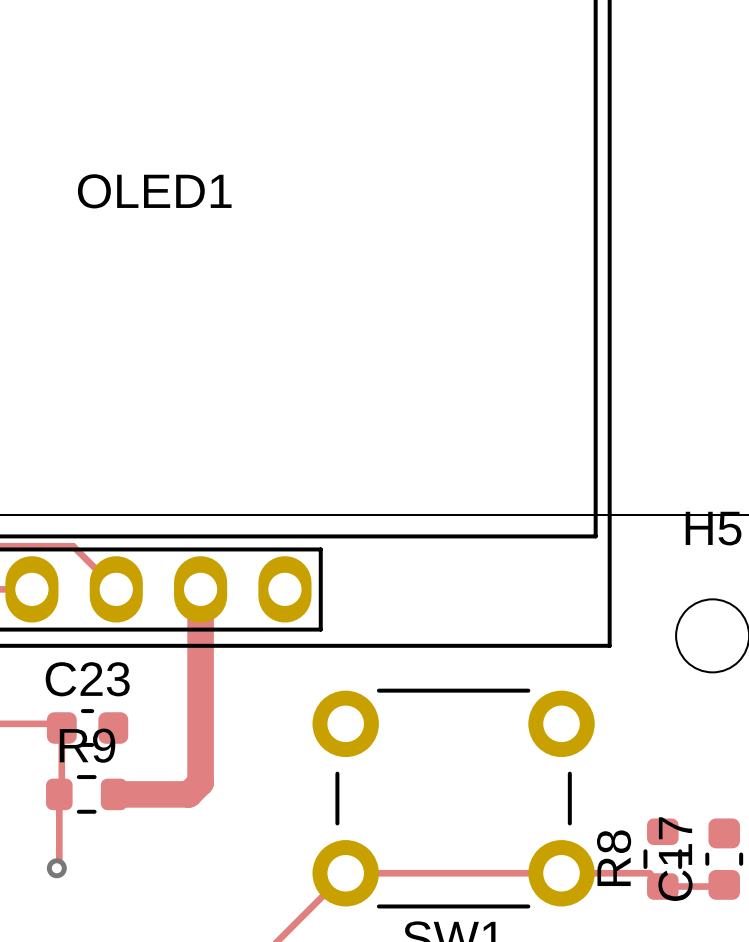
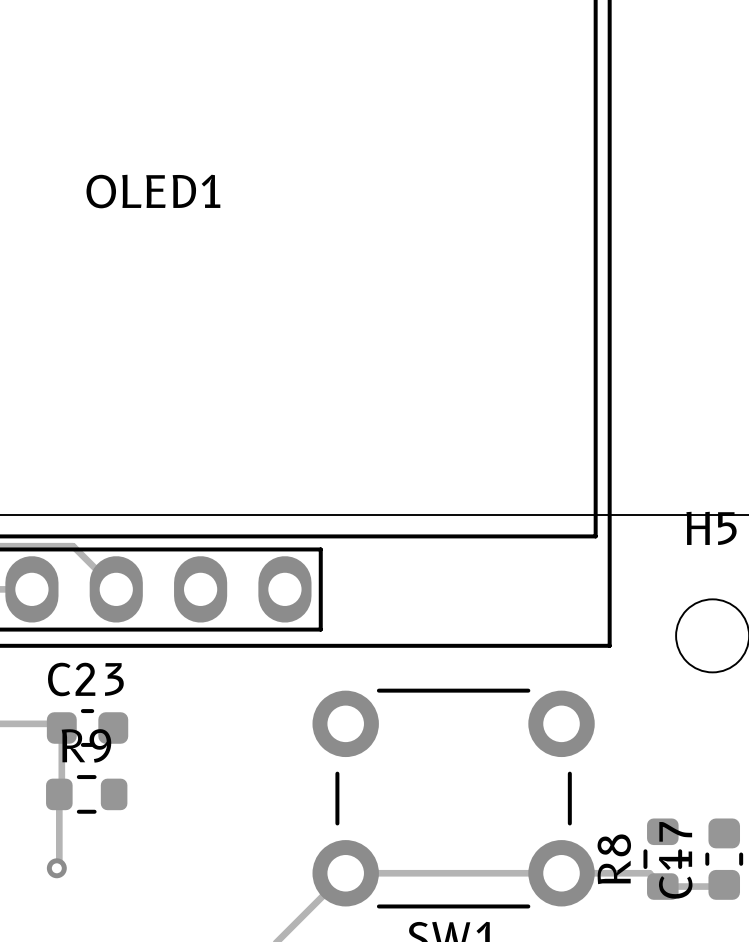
track: (200, 589) (200, 782) (188, 794) (114, 794) -> none

